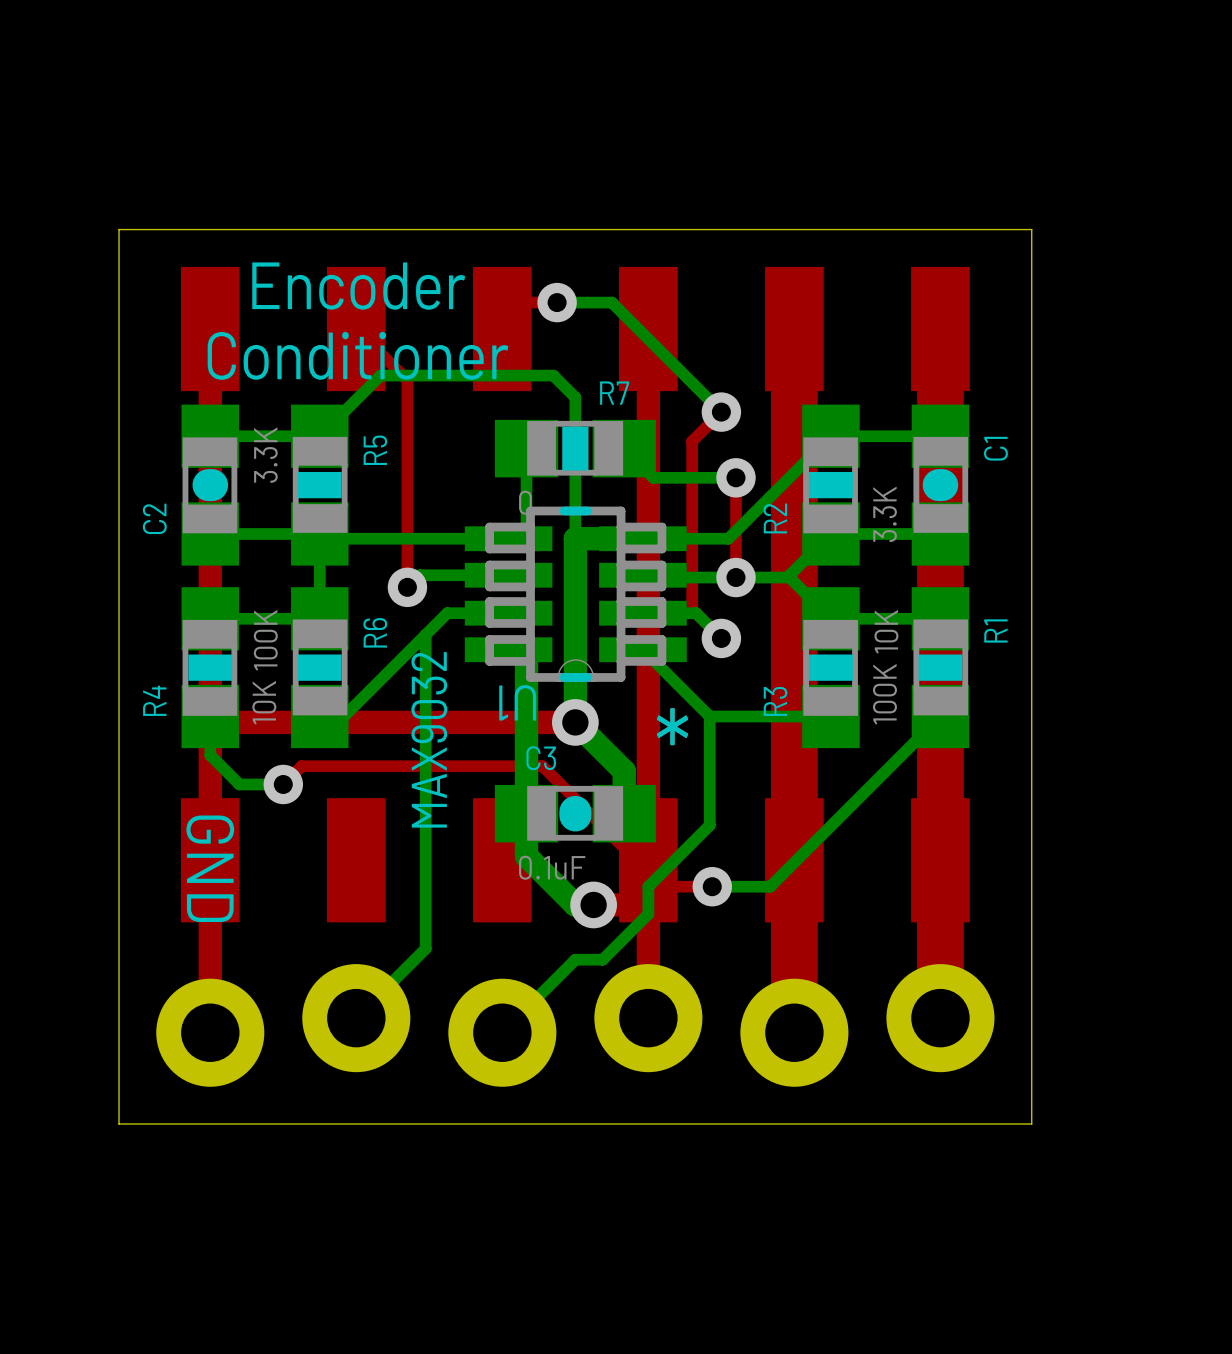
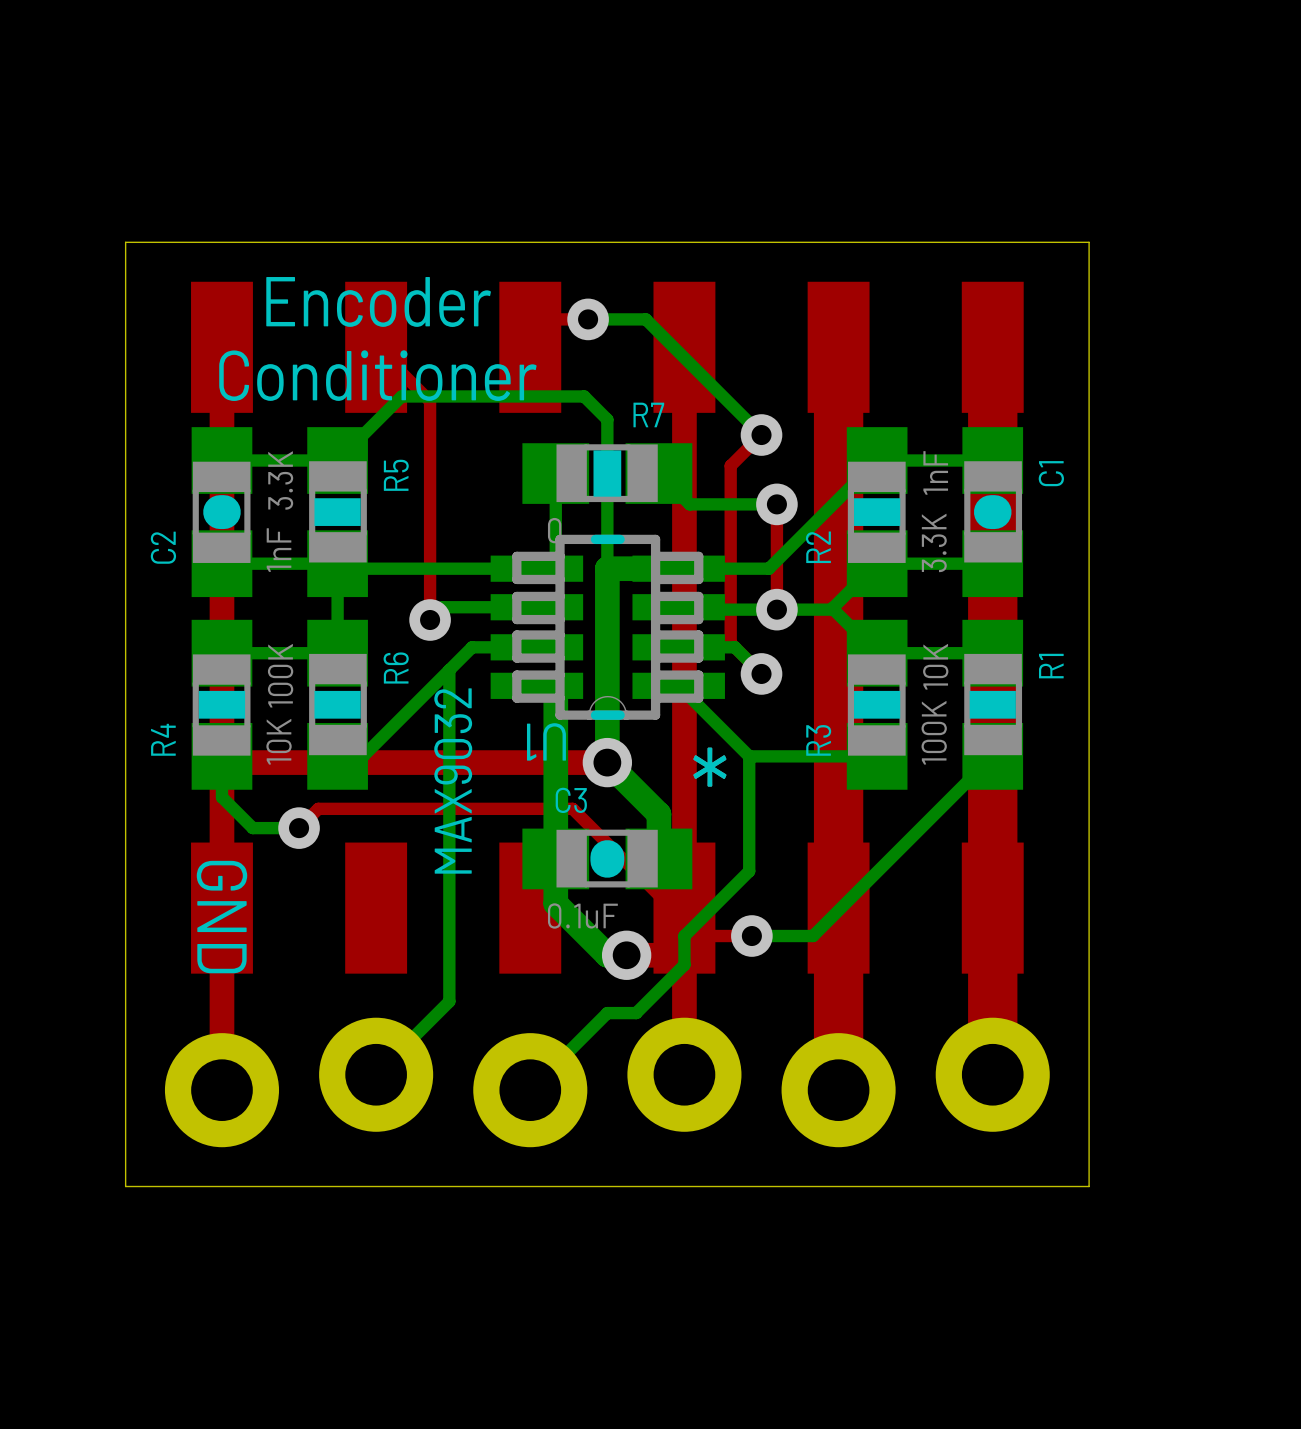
C1 value: none -> 1nF (935, 472)
C2 value: none -> 1nF (279, 550)

